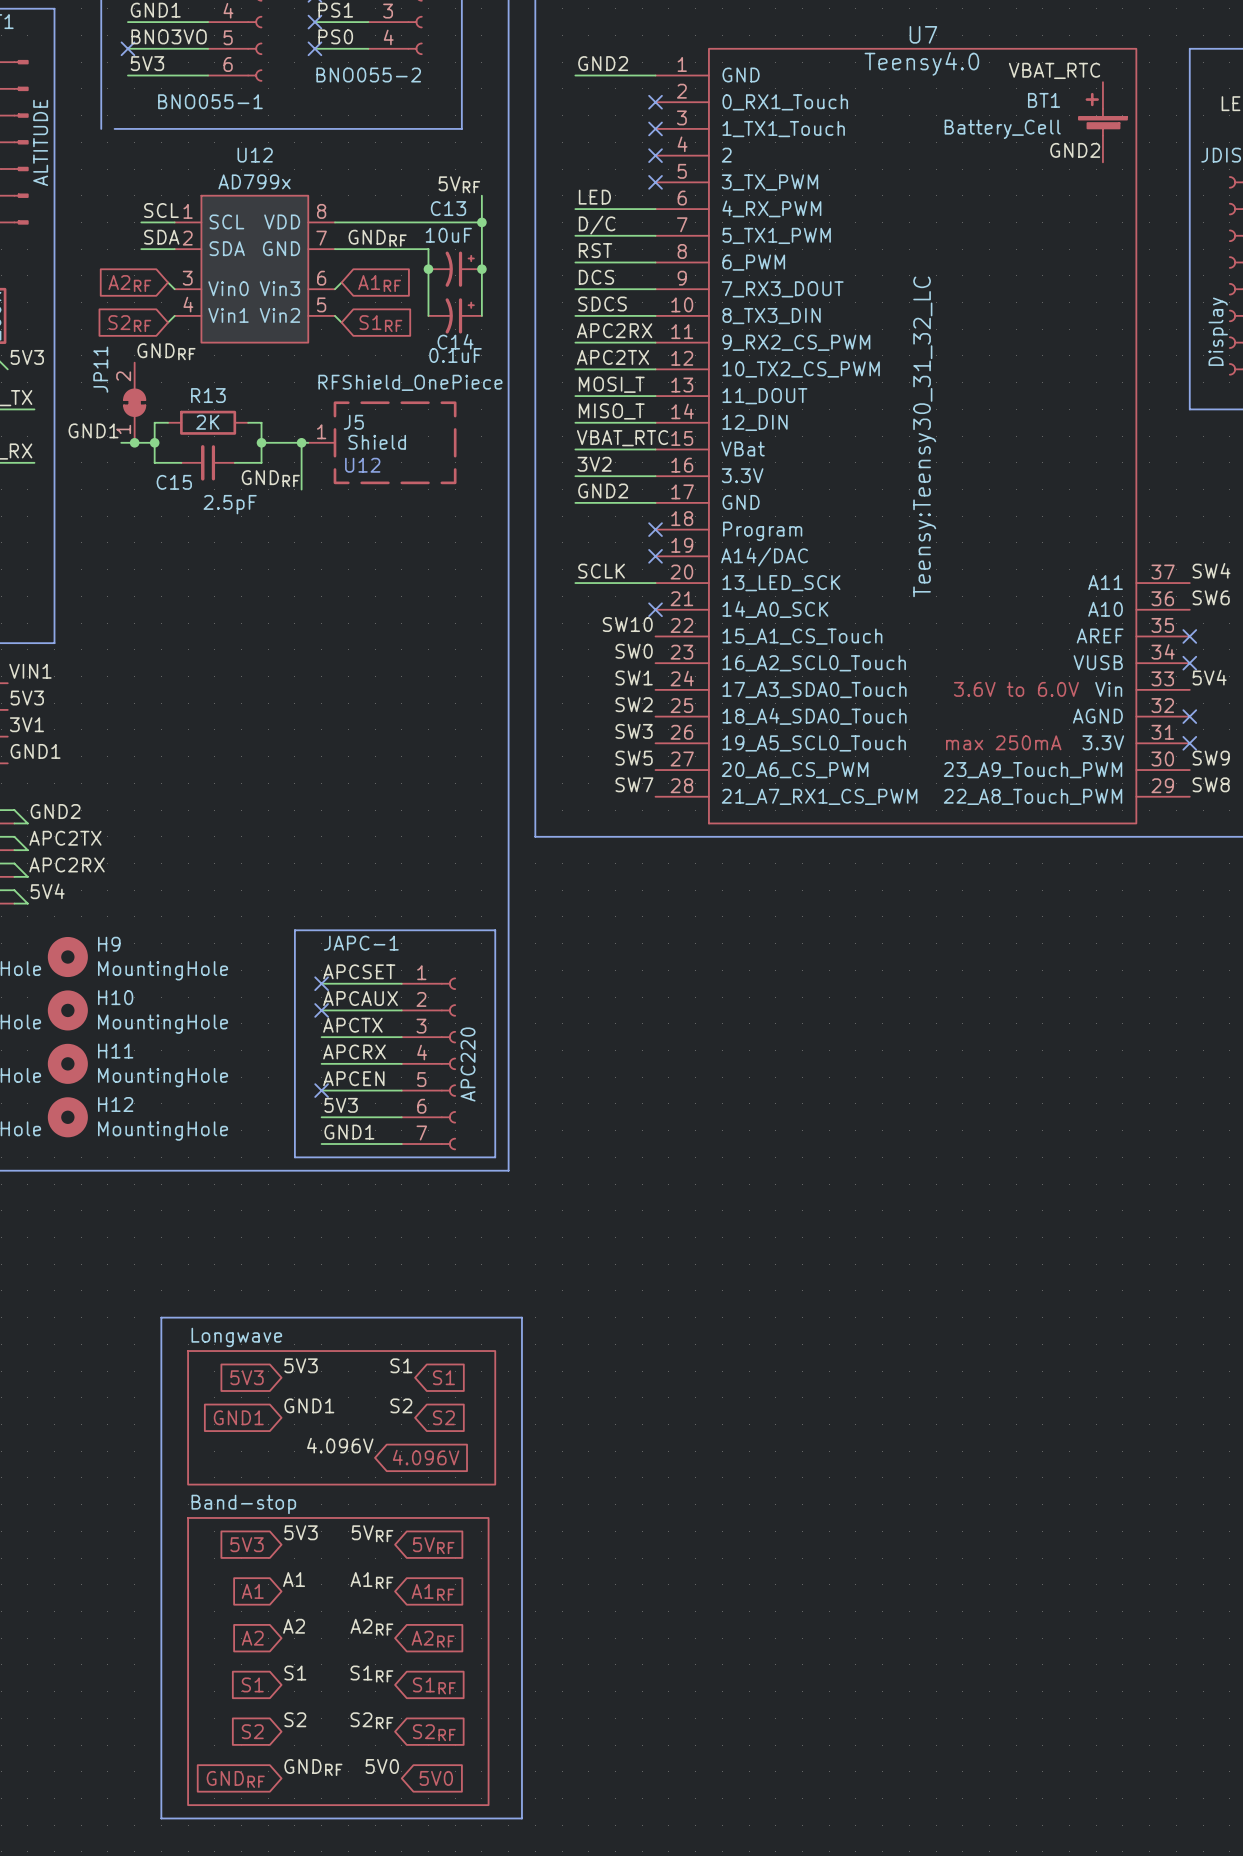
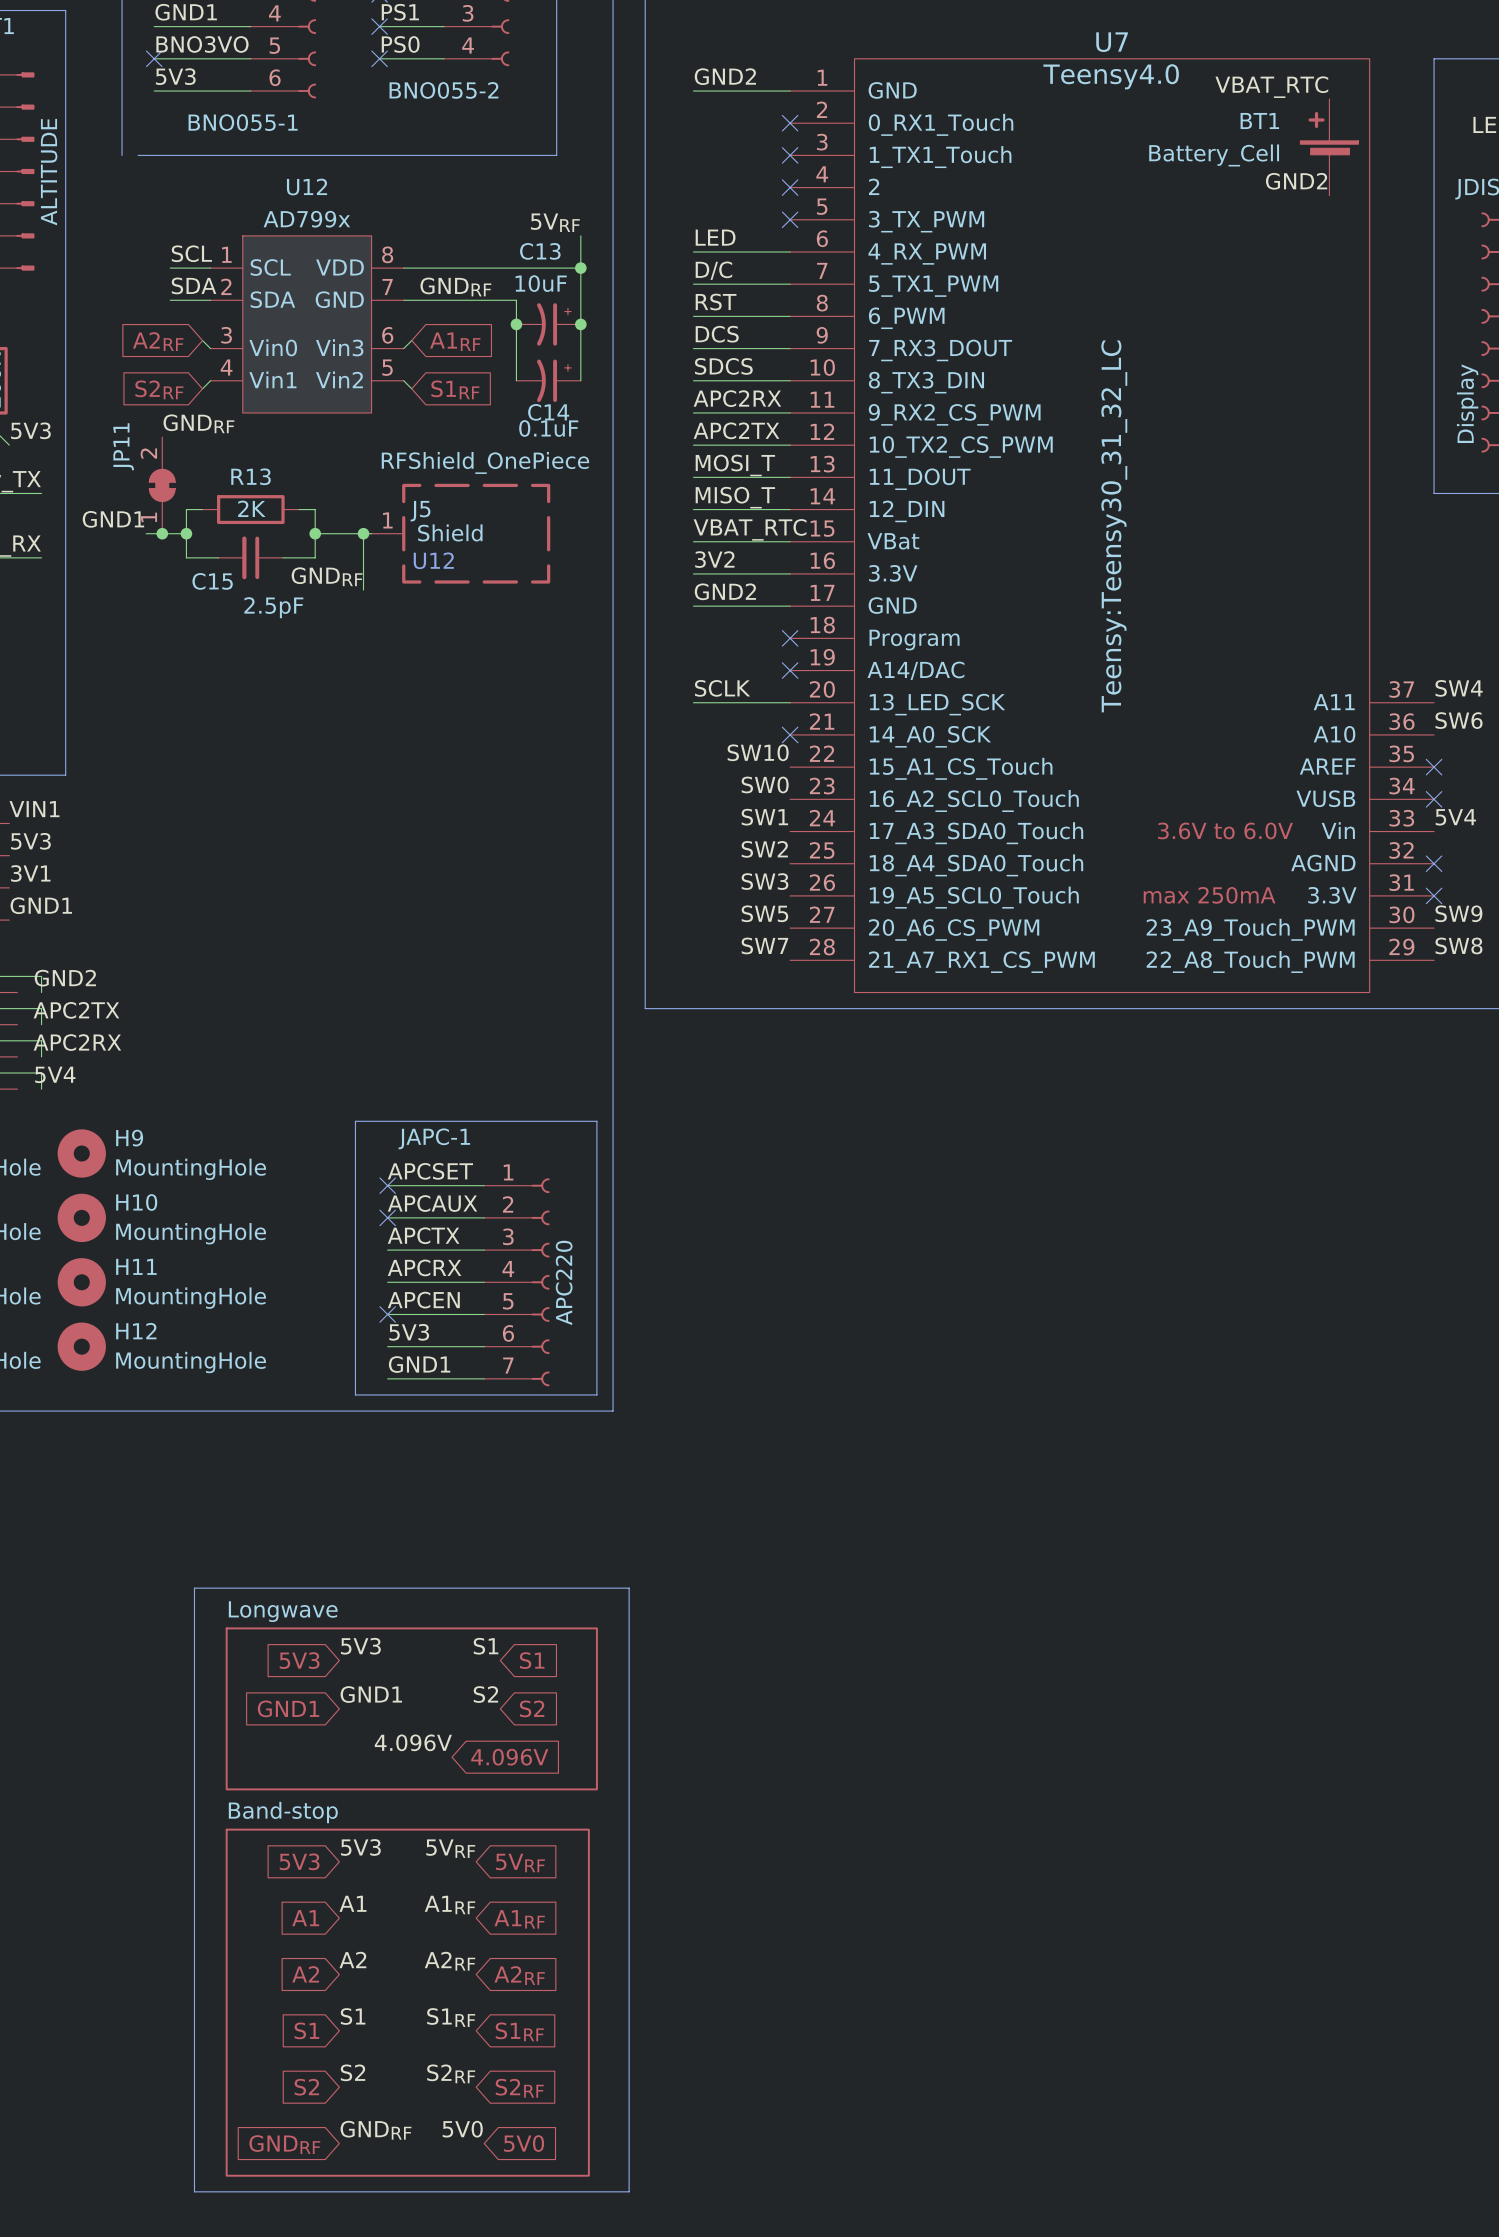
wire: (14, 810) (27, 823) (14, 823) -> (17, 976) (41, 976) (41, 992)
wire: (14, 836) (27, 850) (14, 850) -> (17, 1008) (41, 1008) (41, 1024)
wire: (14, 863) (27, 876) (14, 876) -> (17, 1040) (41, 1040) (41, 1056)
wire: (14, 890) (27, 903) (14, 903) -> (17, 1073) (41, 1073) (41, 1089)

